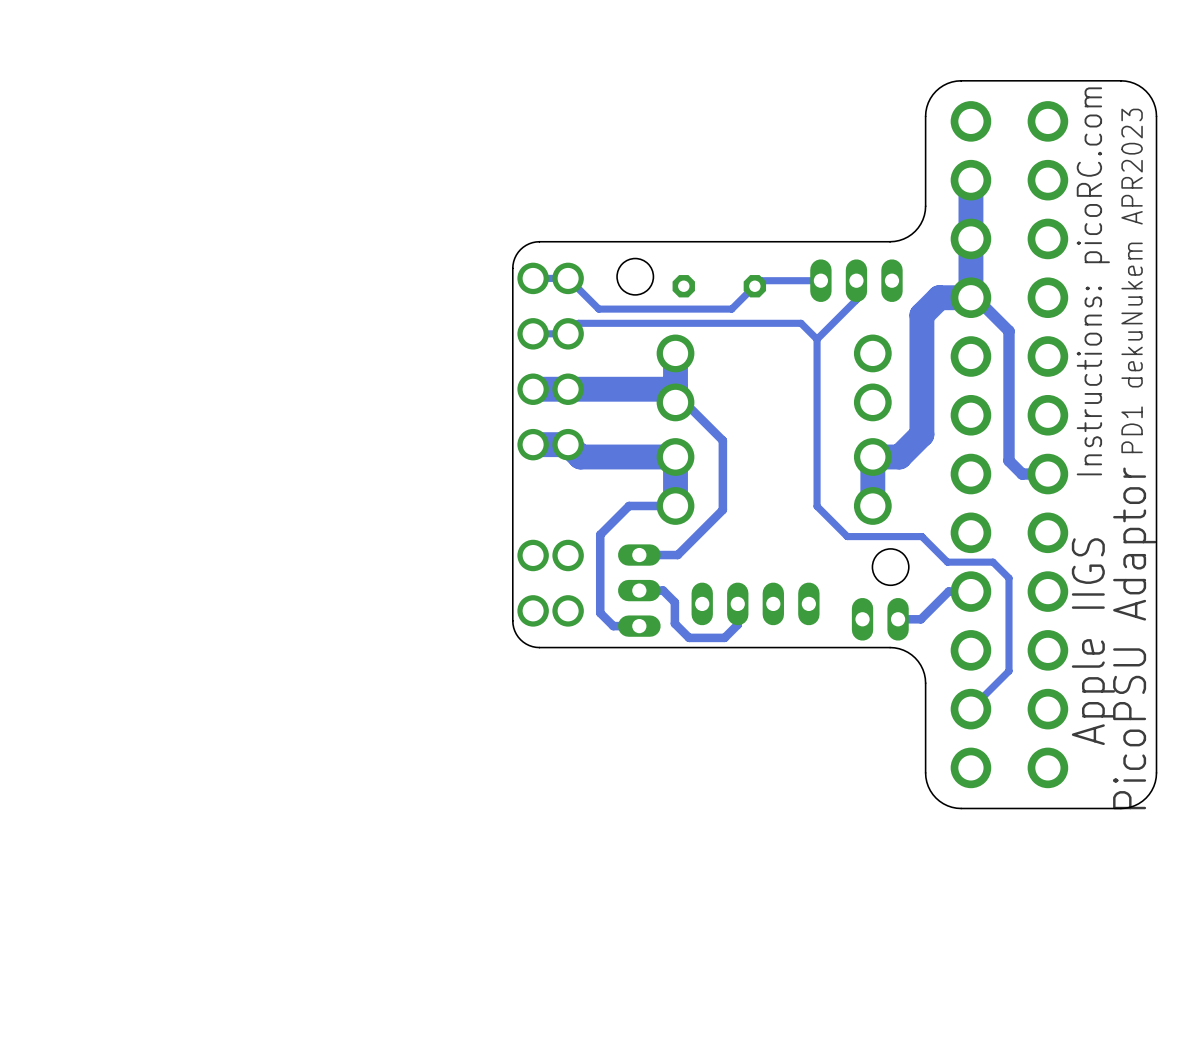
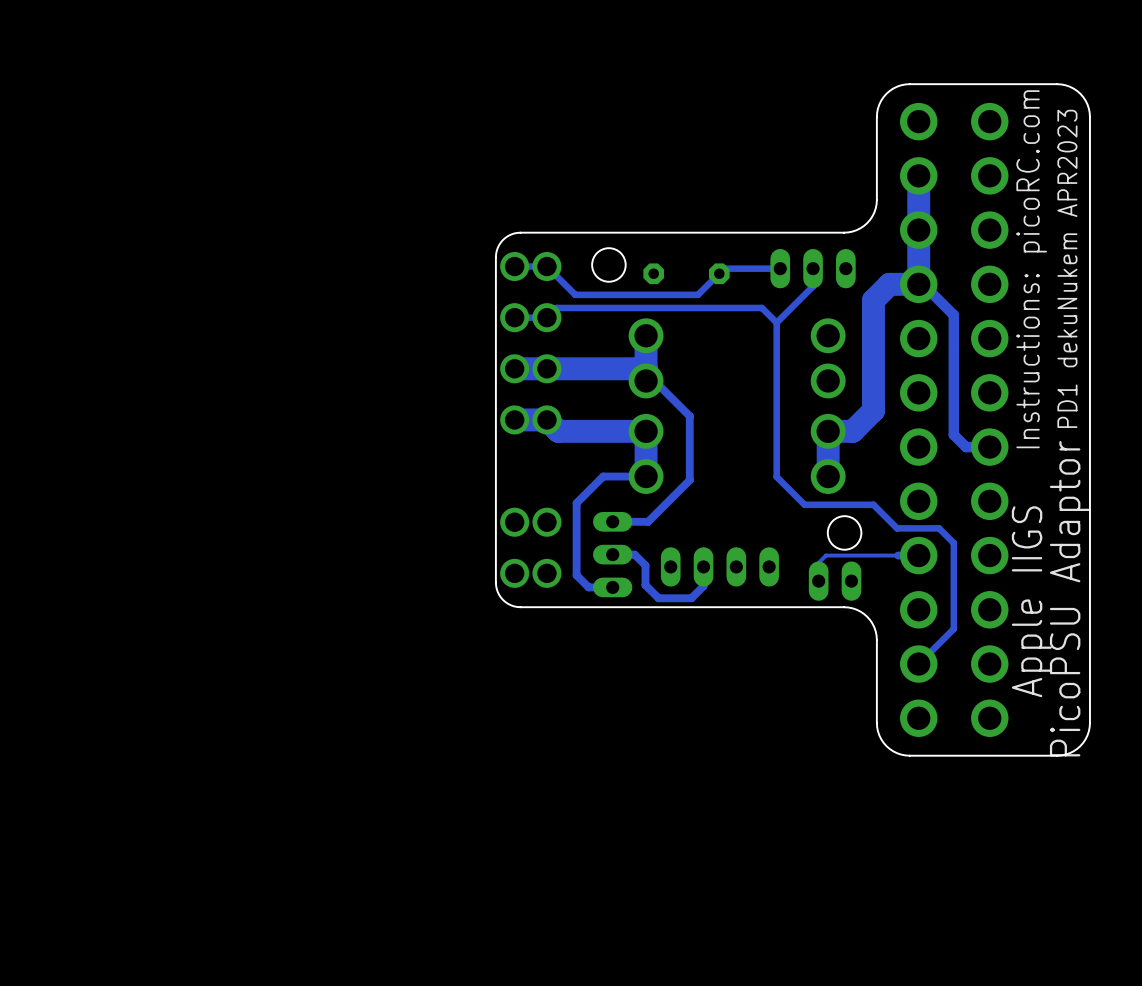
track: (948, 591) (920, 619) (898, 619) -> (898, 555) (825, 555) (818, 562) (818, 582)

